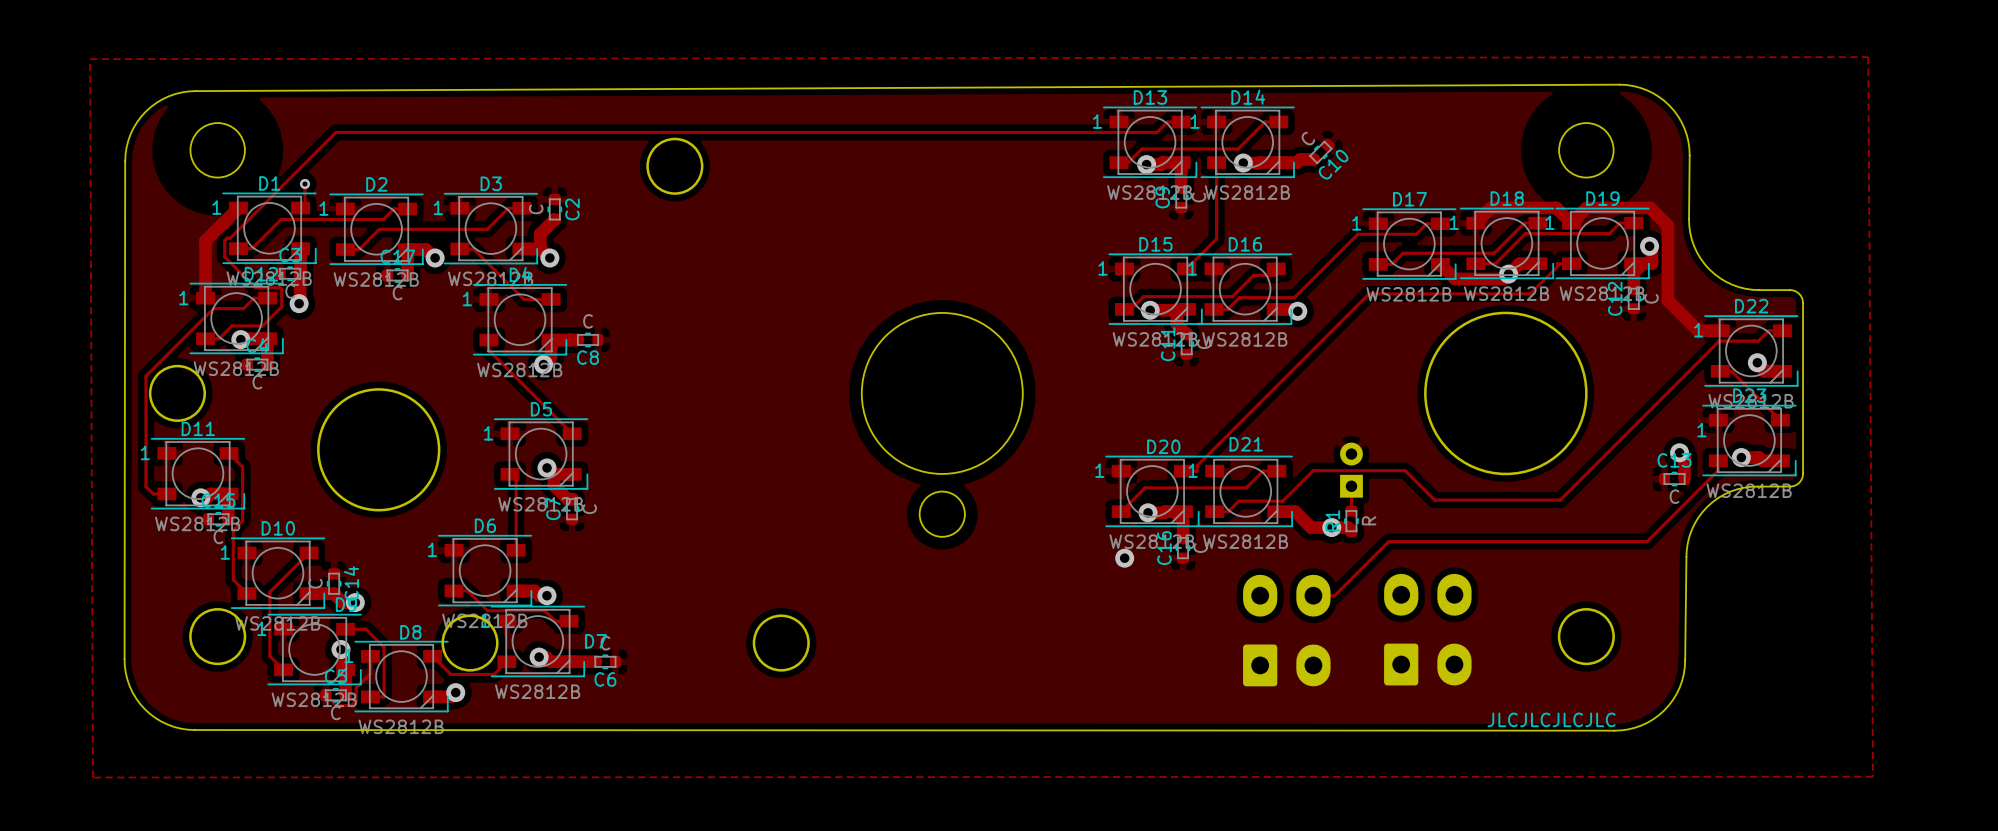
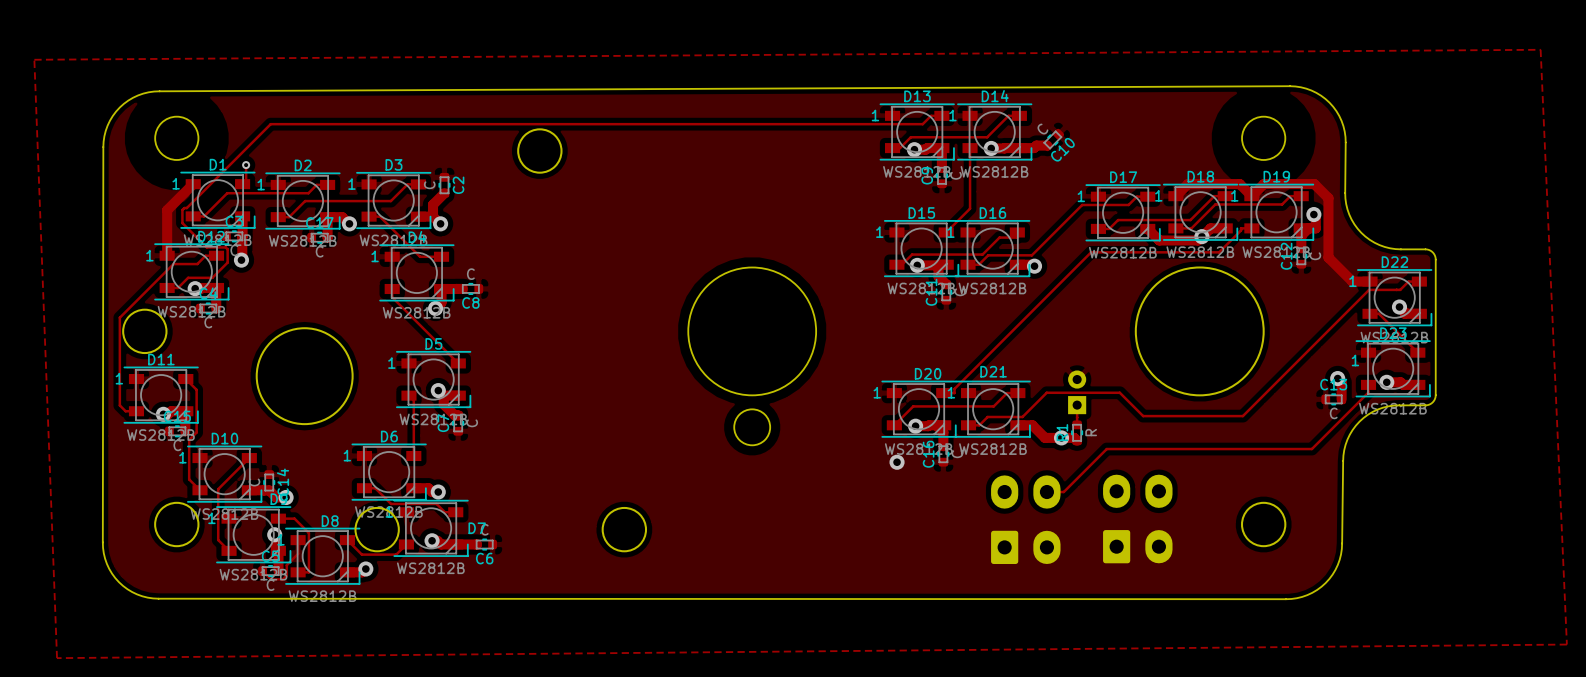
zone outline: (1868, 57) (90, 59) (92, 777) (1873, 776) (1868, 57) -> (1540, 49) (34, 59) (57, 658) (1566, 644) (1540, 49)
text: JLCJLCJLCJLC (1551, 719) -> none

